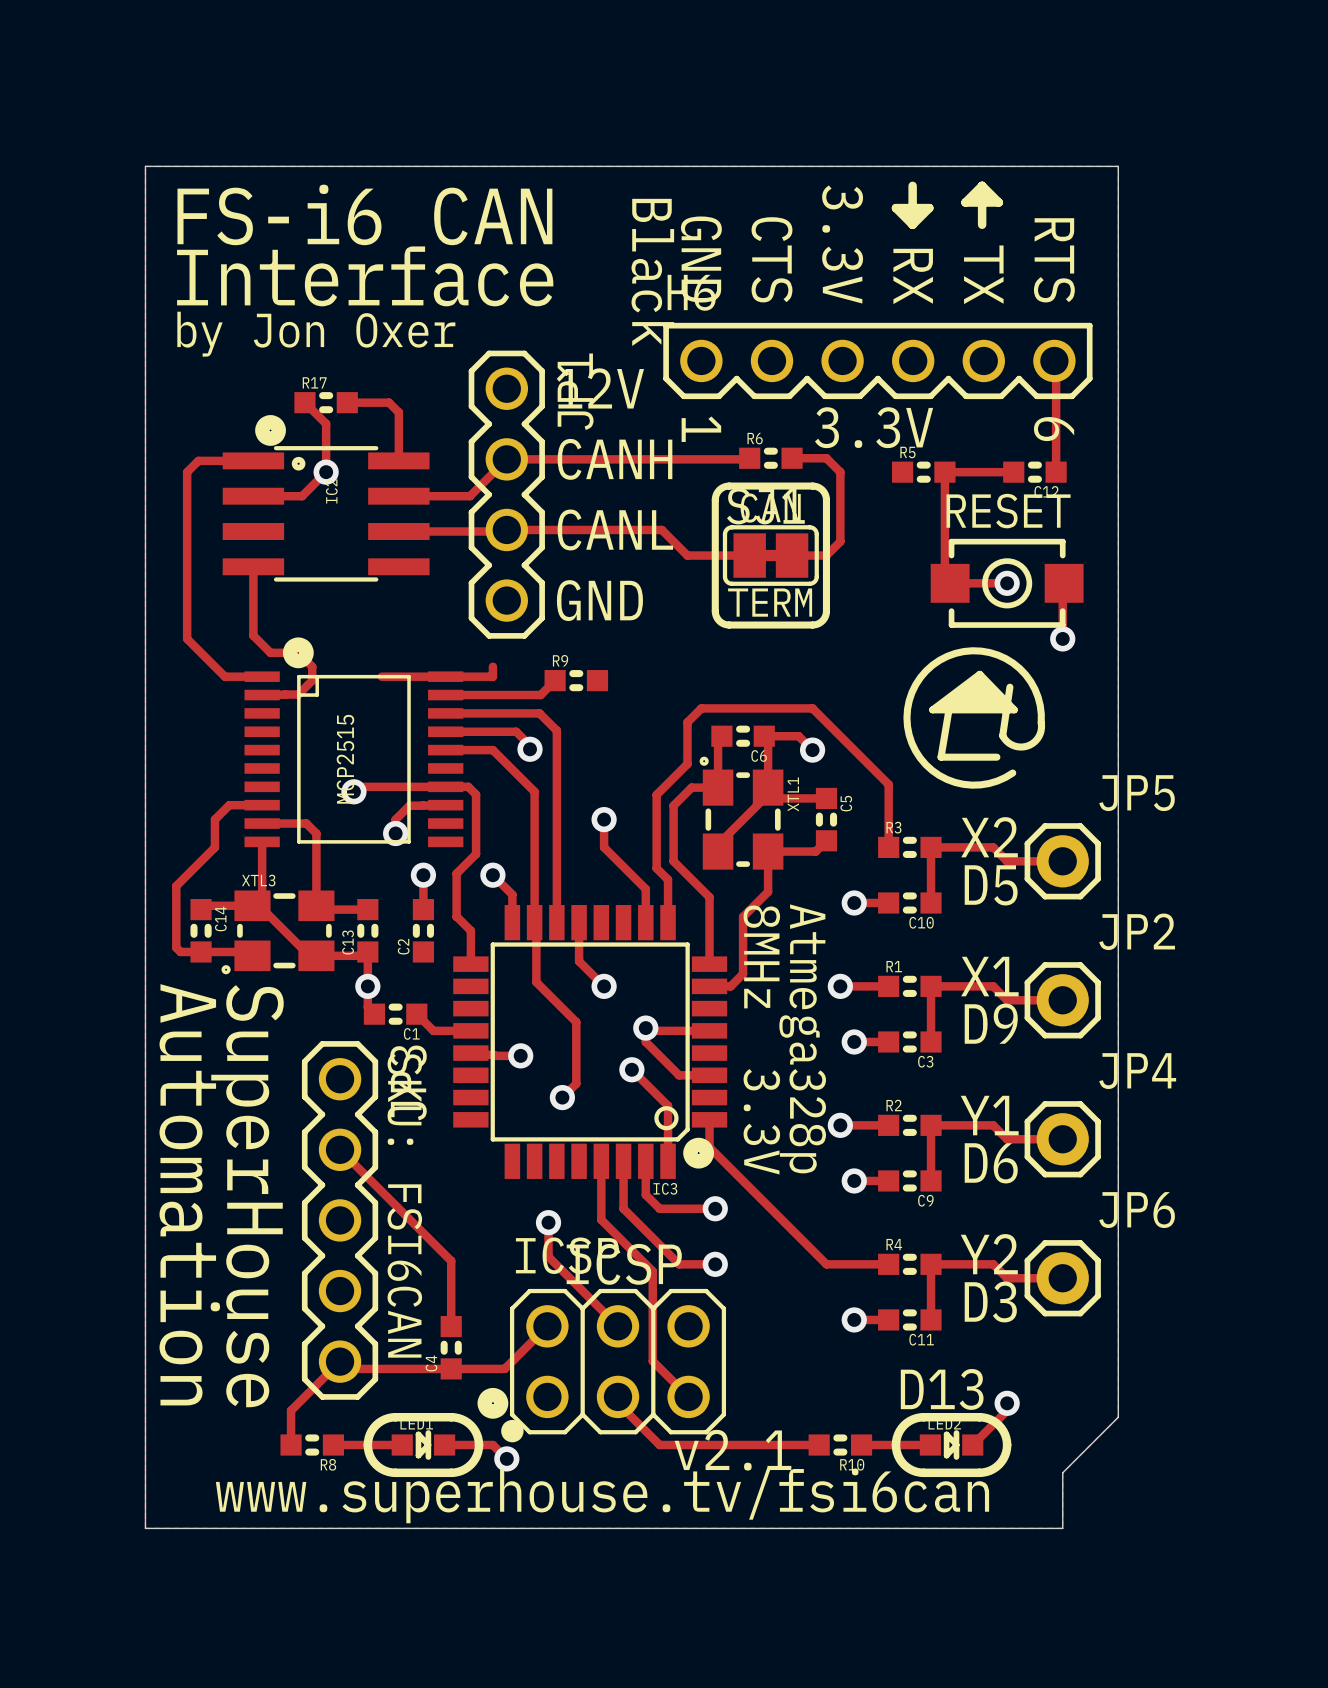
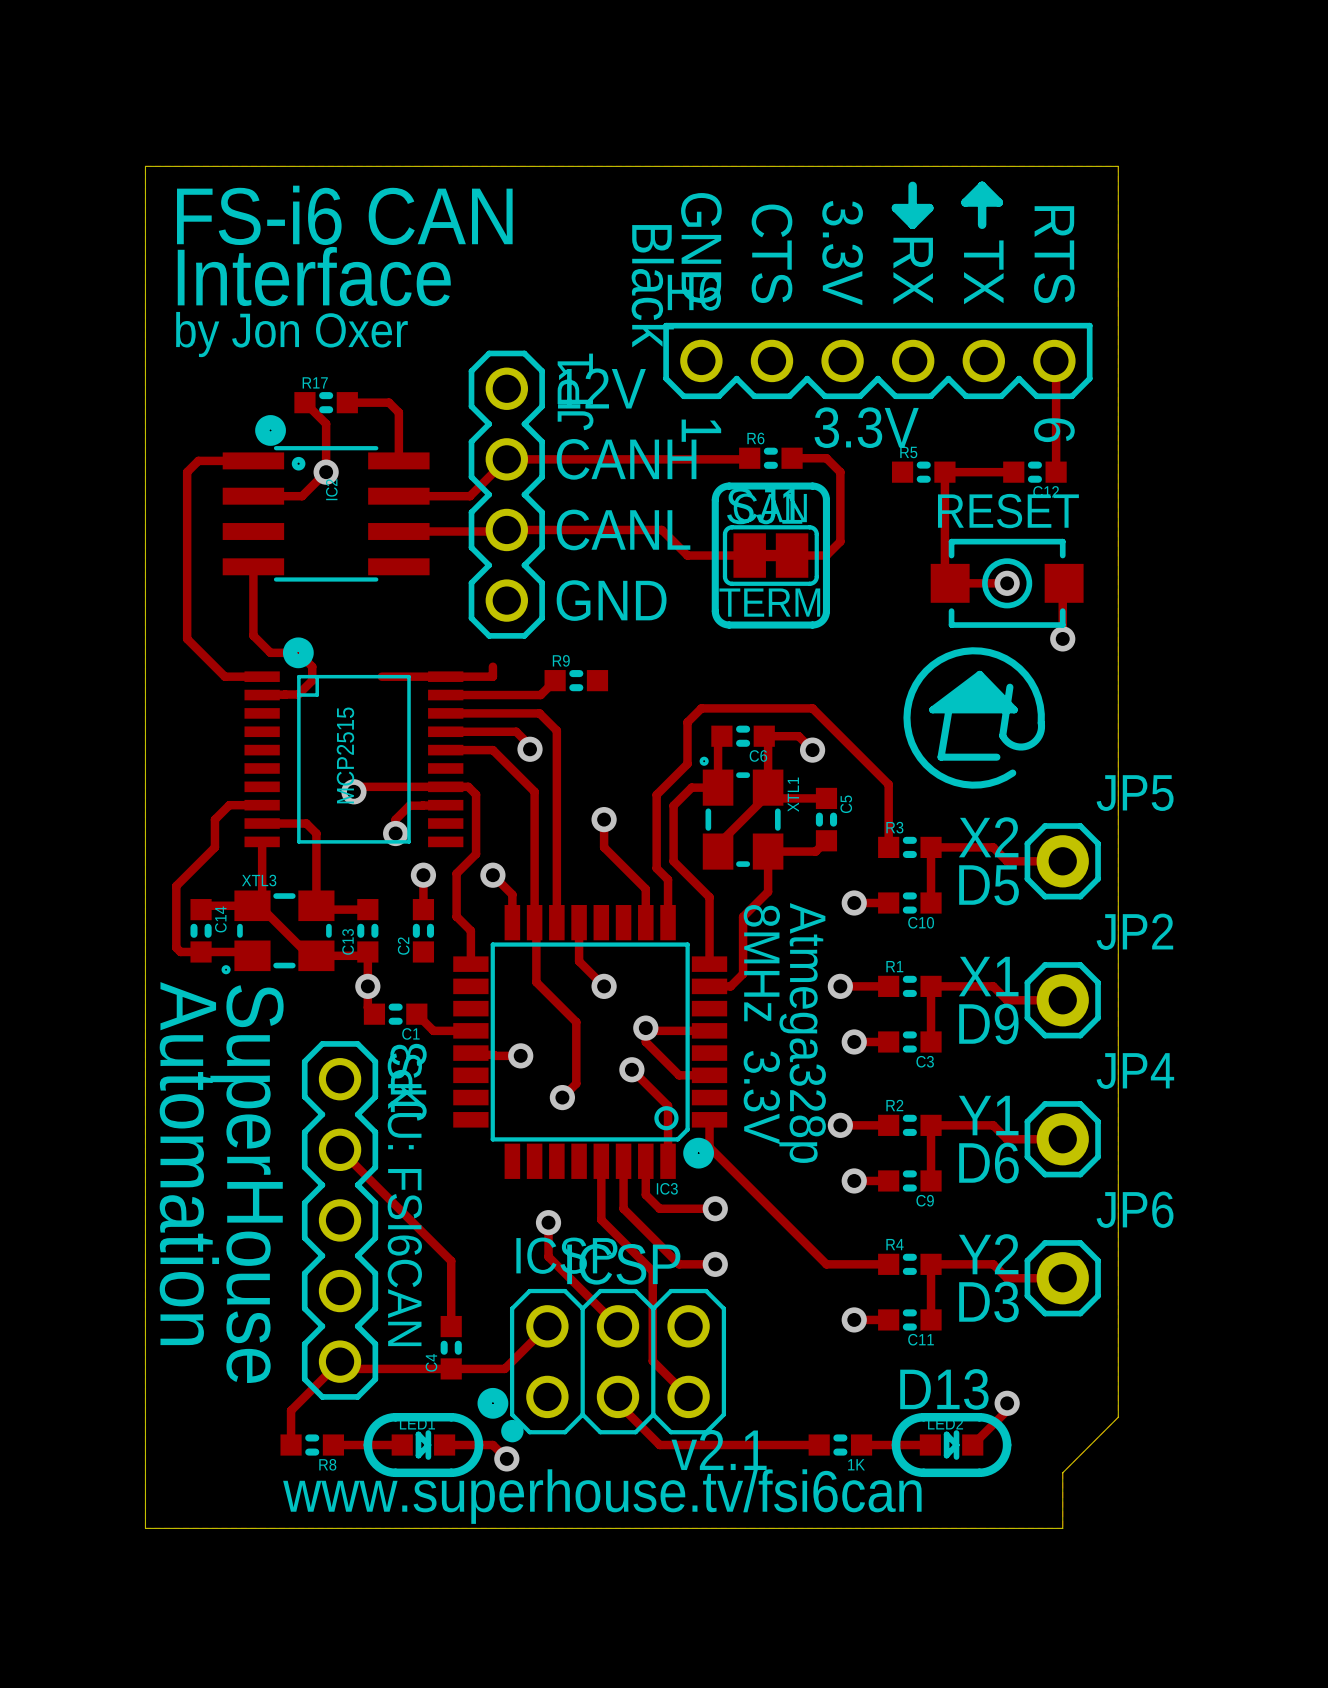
R10 name: R10 (852, 1464) -> 1K (856, 1464)

